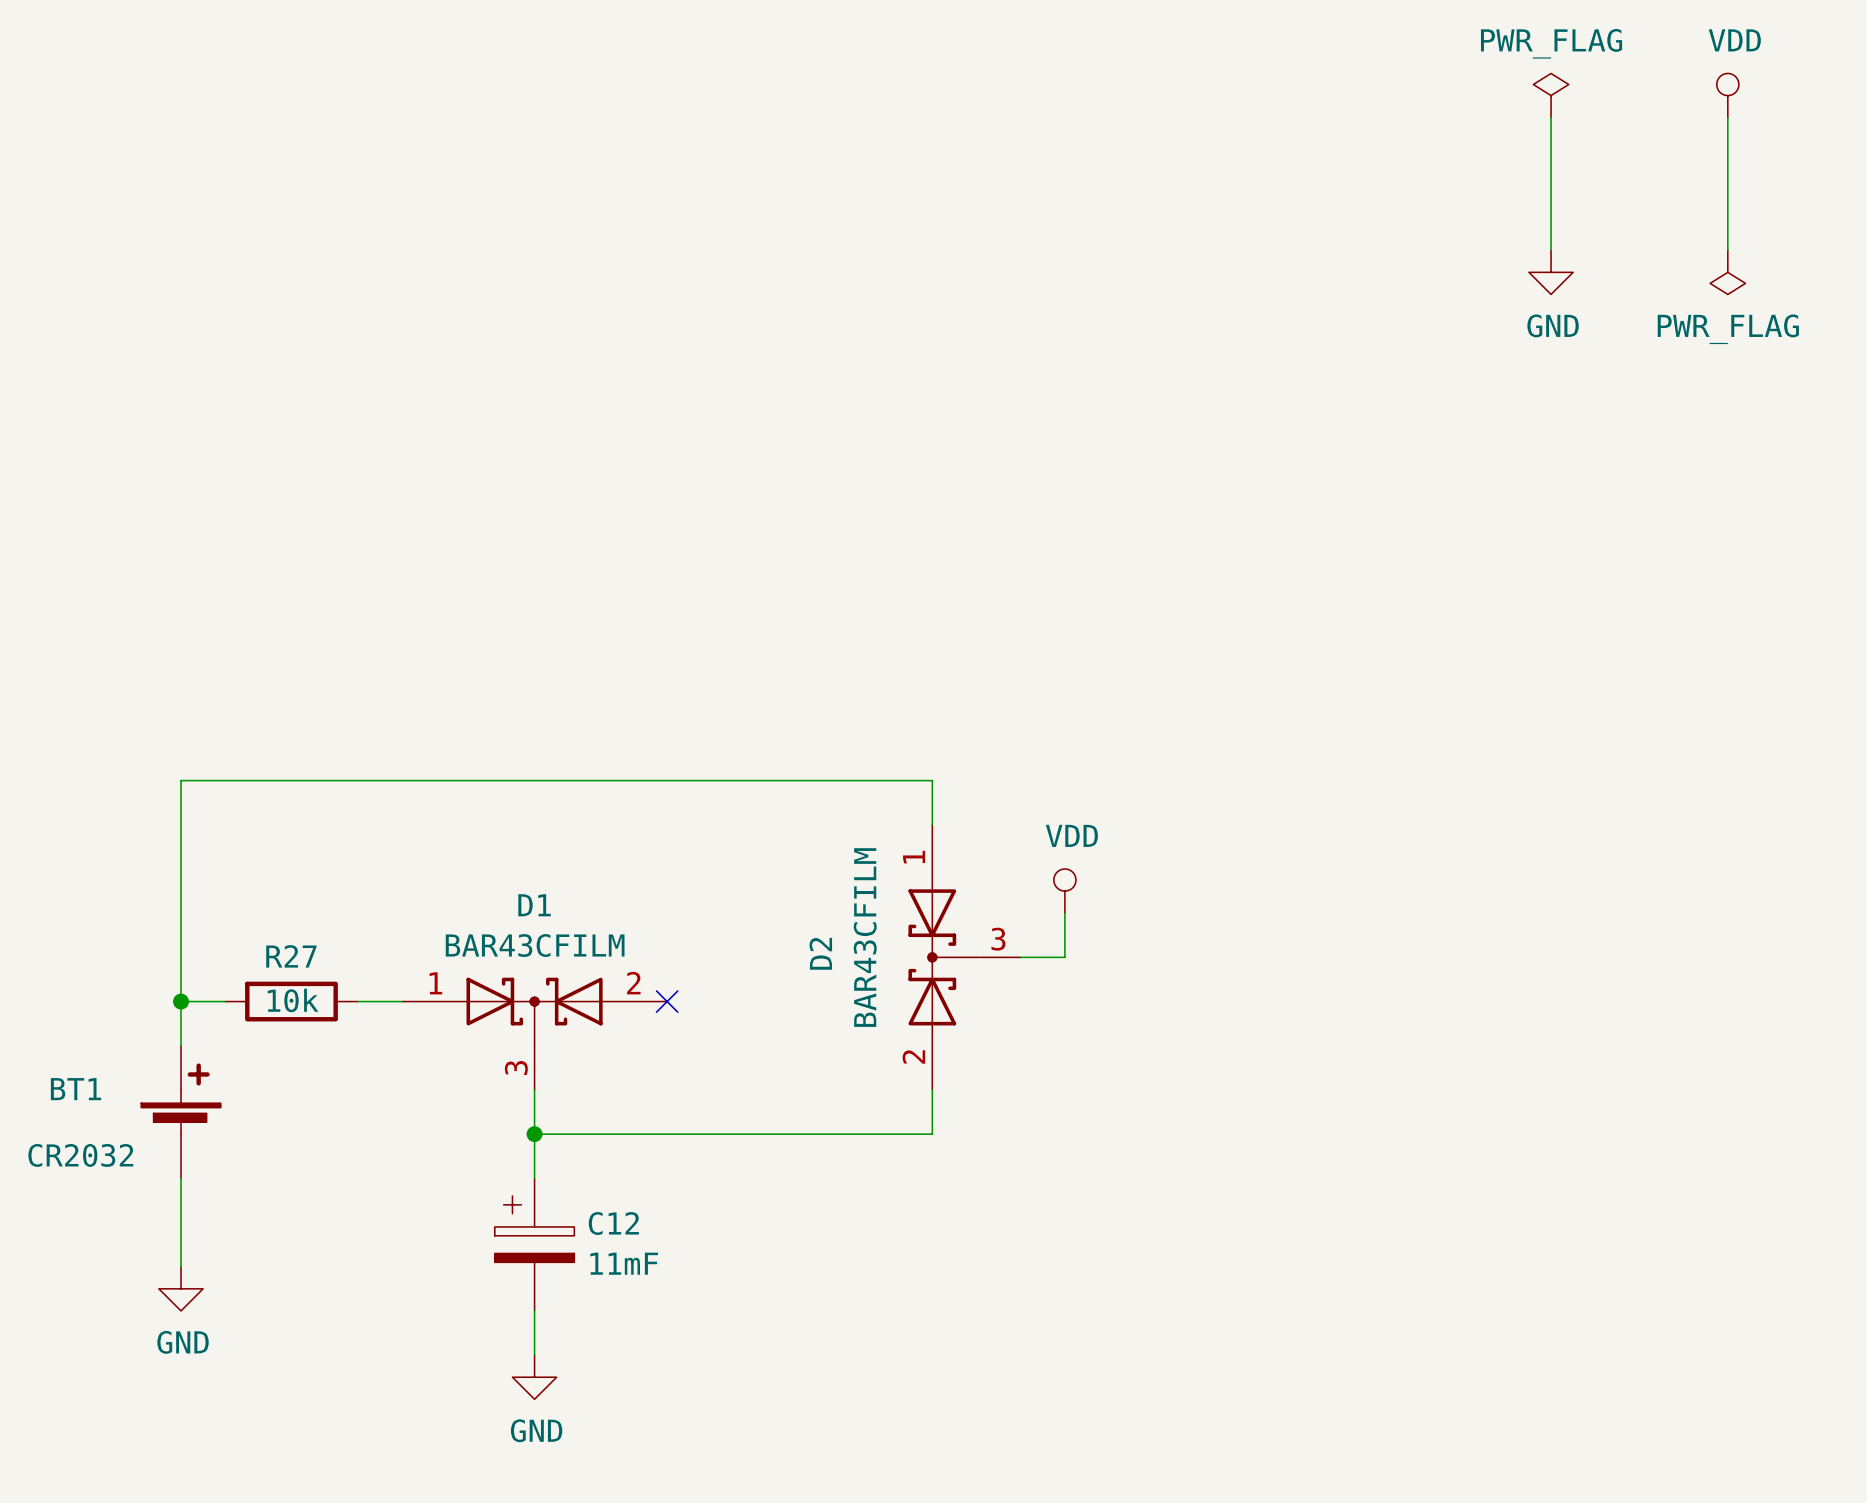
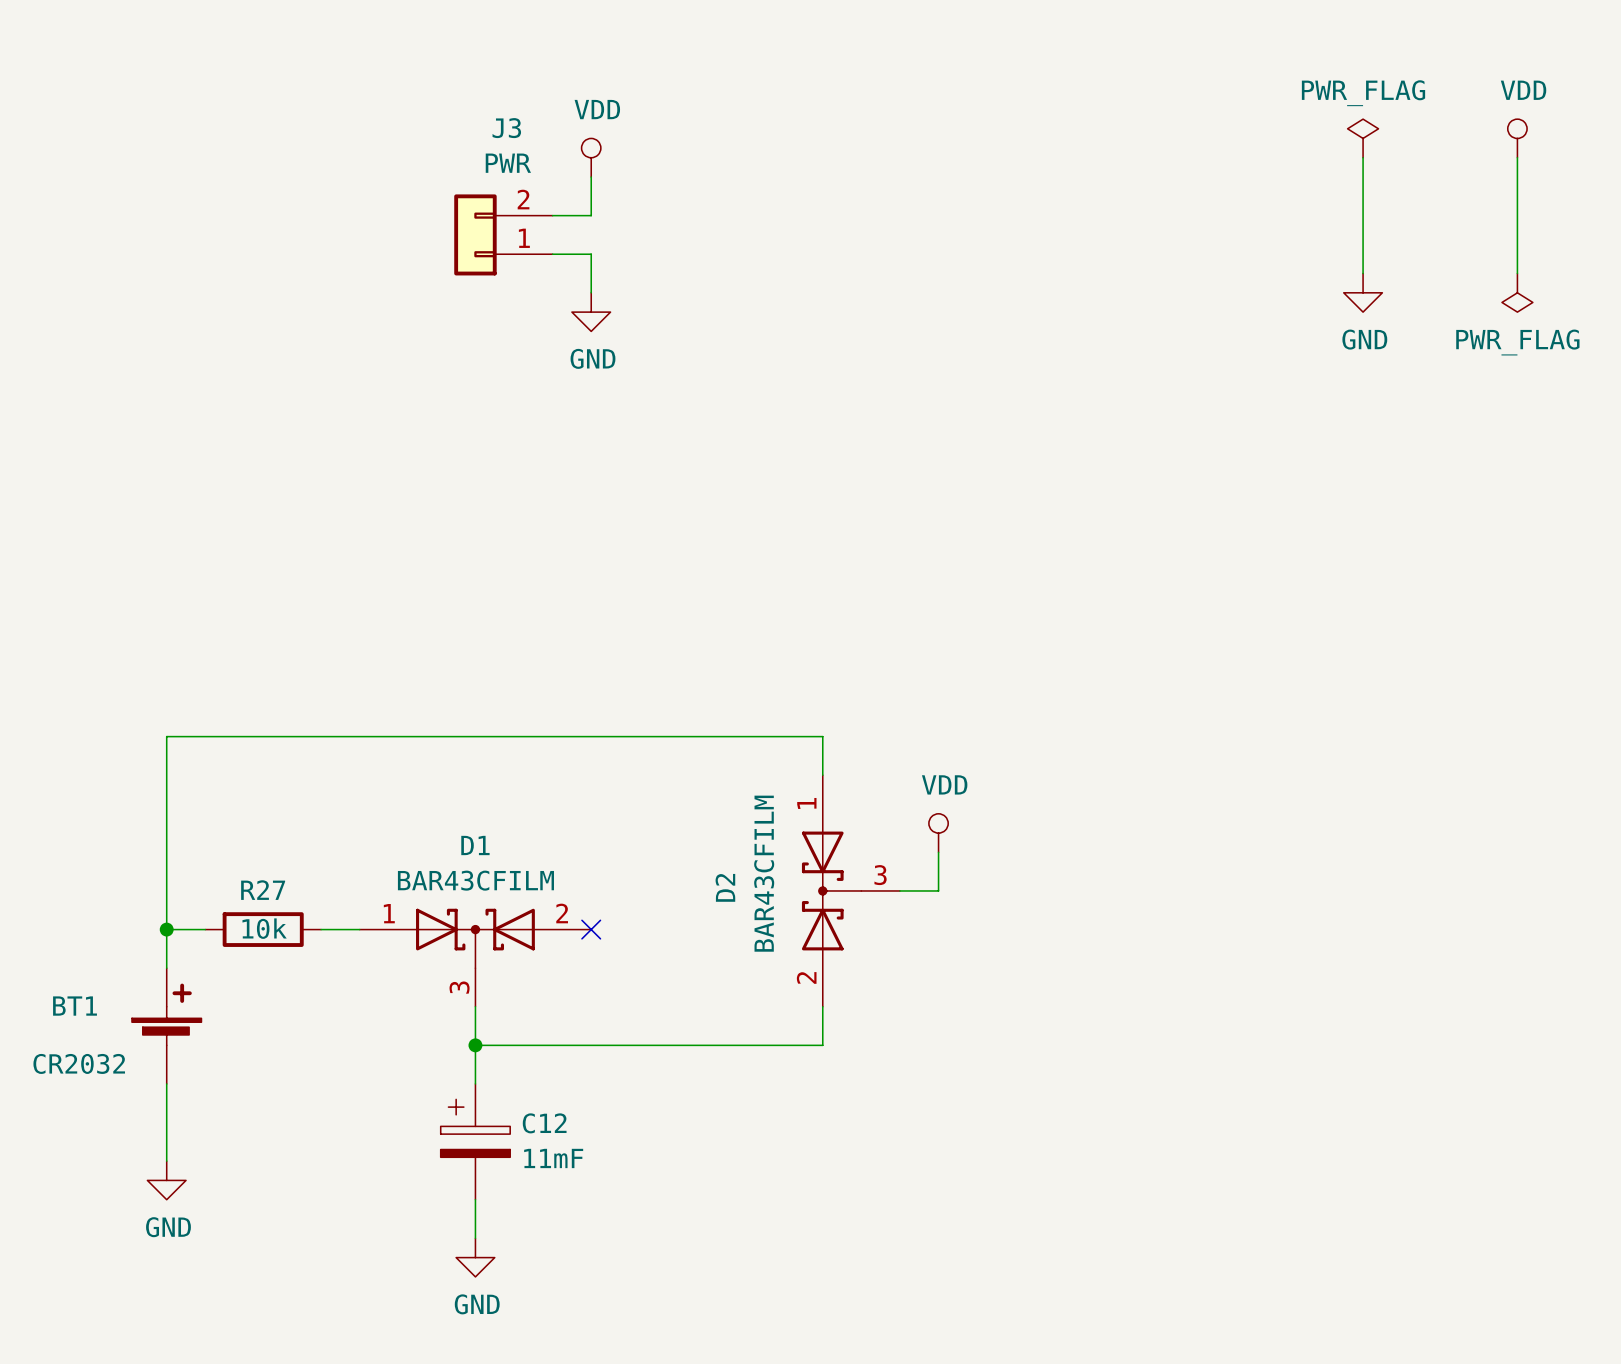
power symbol: none -> VDD (591, 157)
wire: none -> (591, 177) (591, 215) (552, 215)
J3: none -> PWR (503, 234)
wire: none -> (552, 254) (591, 254) (591, 292)
power symbol: none -> GND (591, 312)

